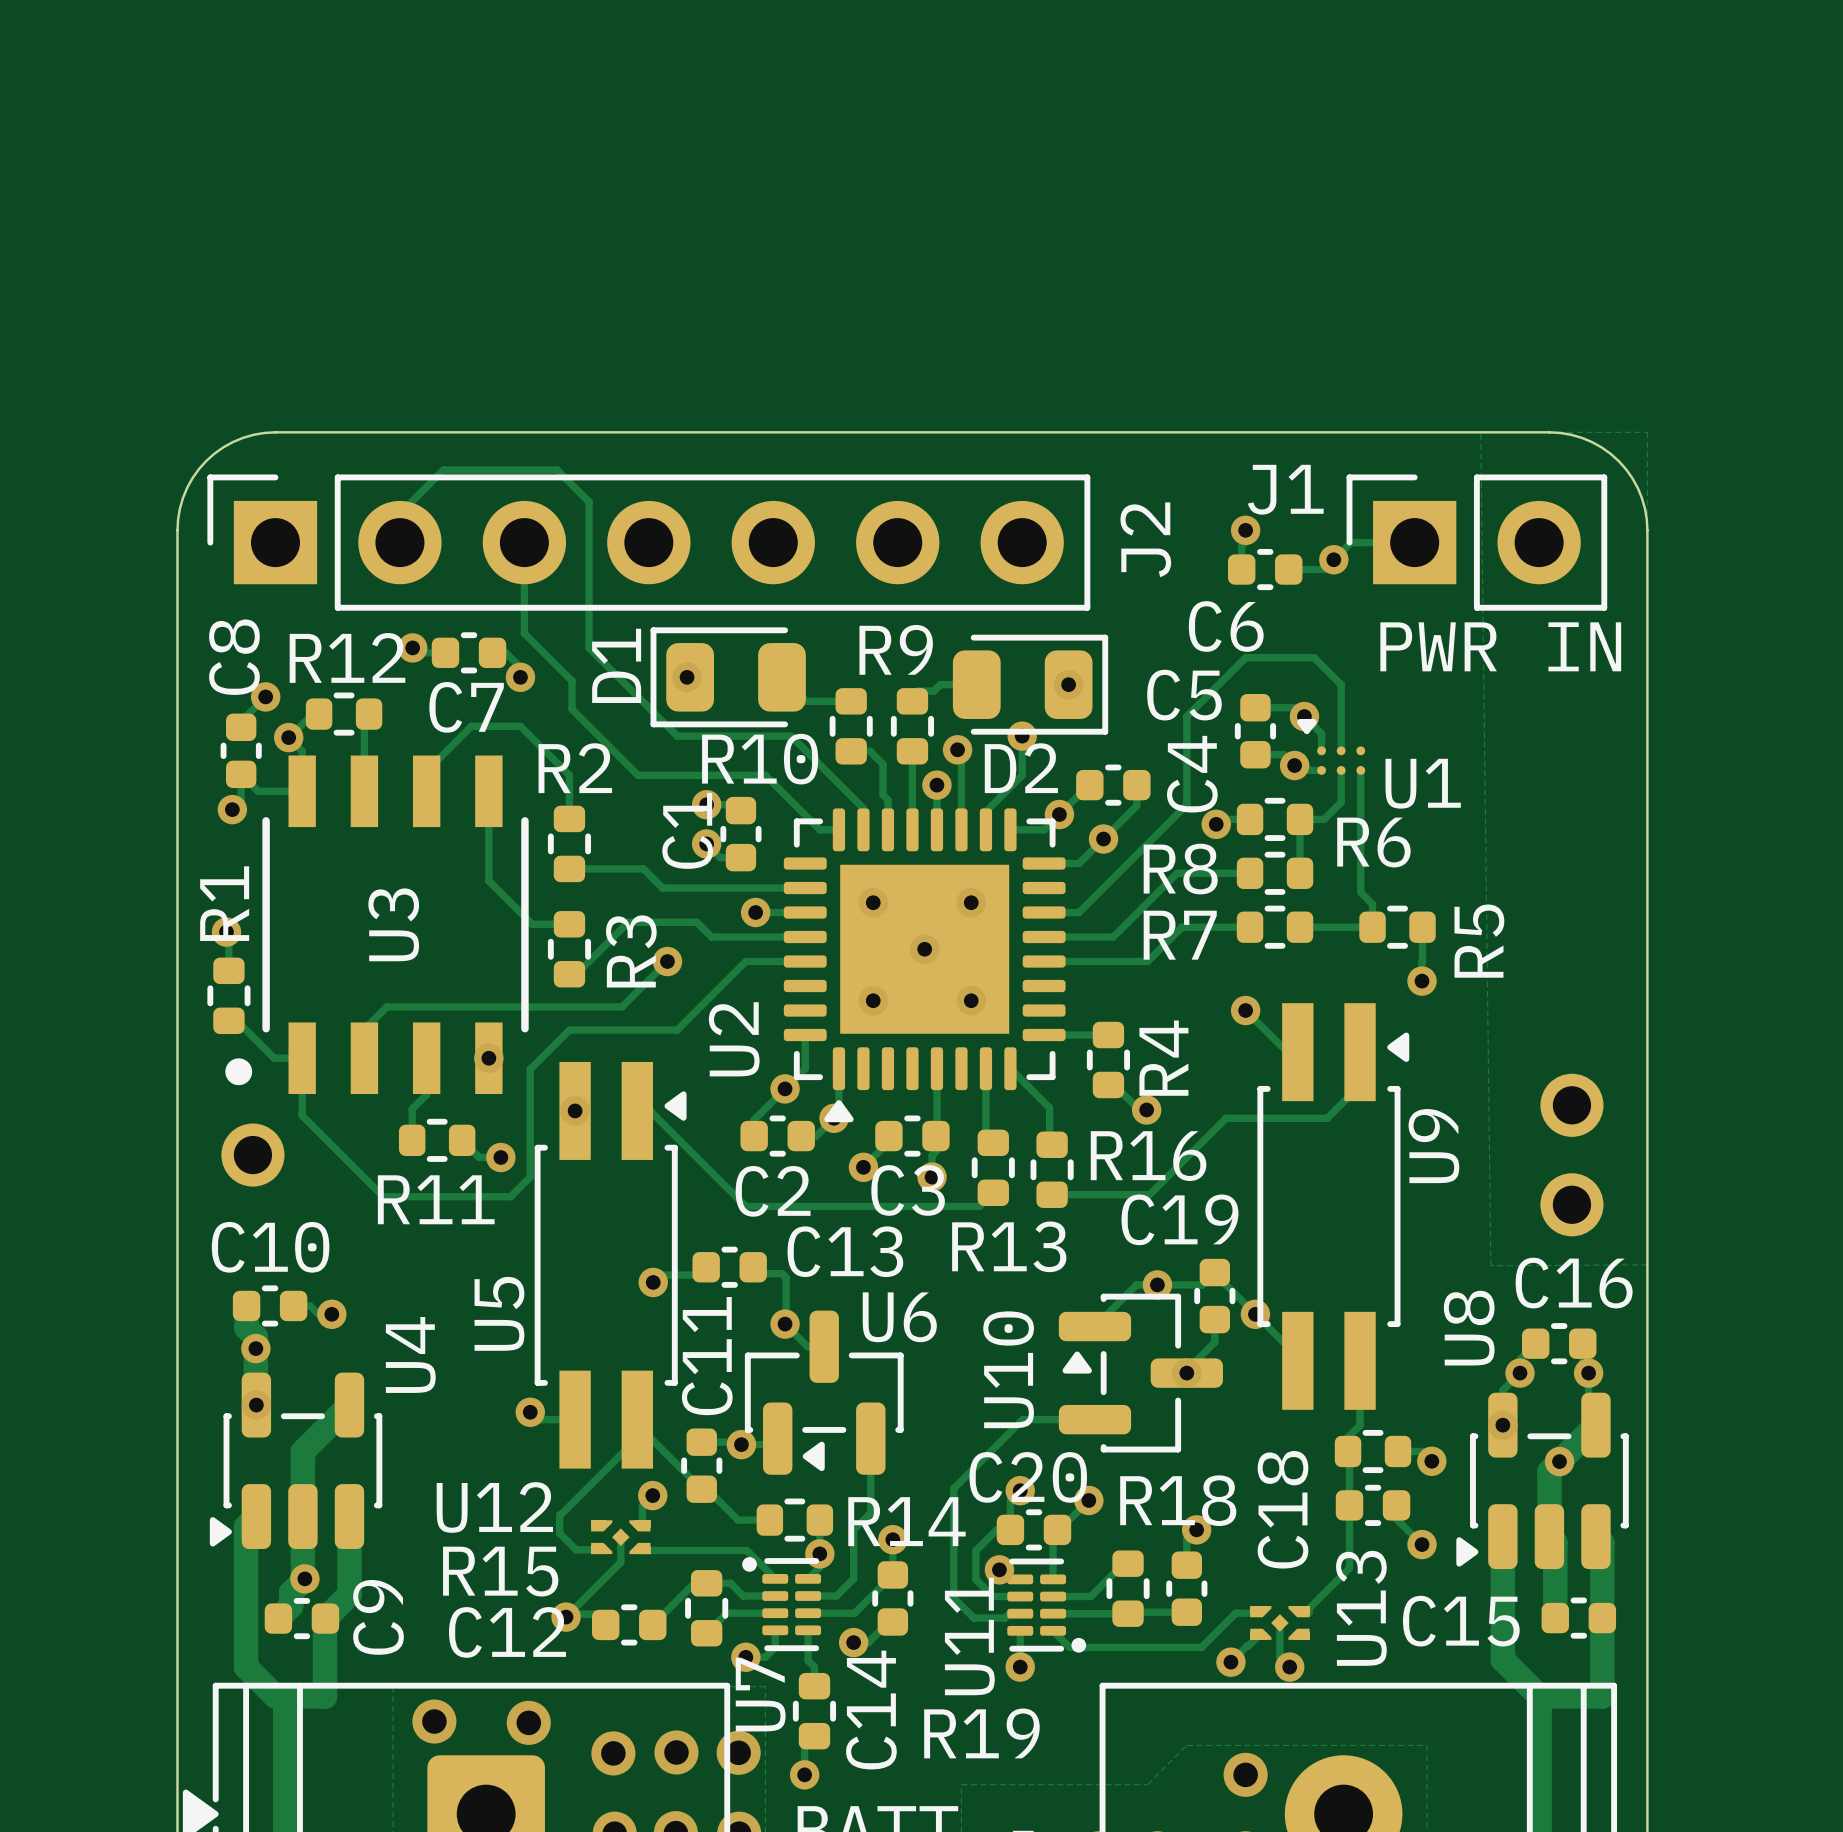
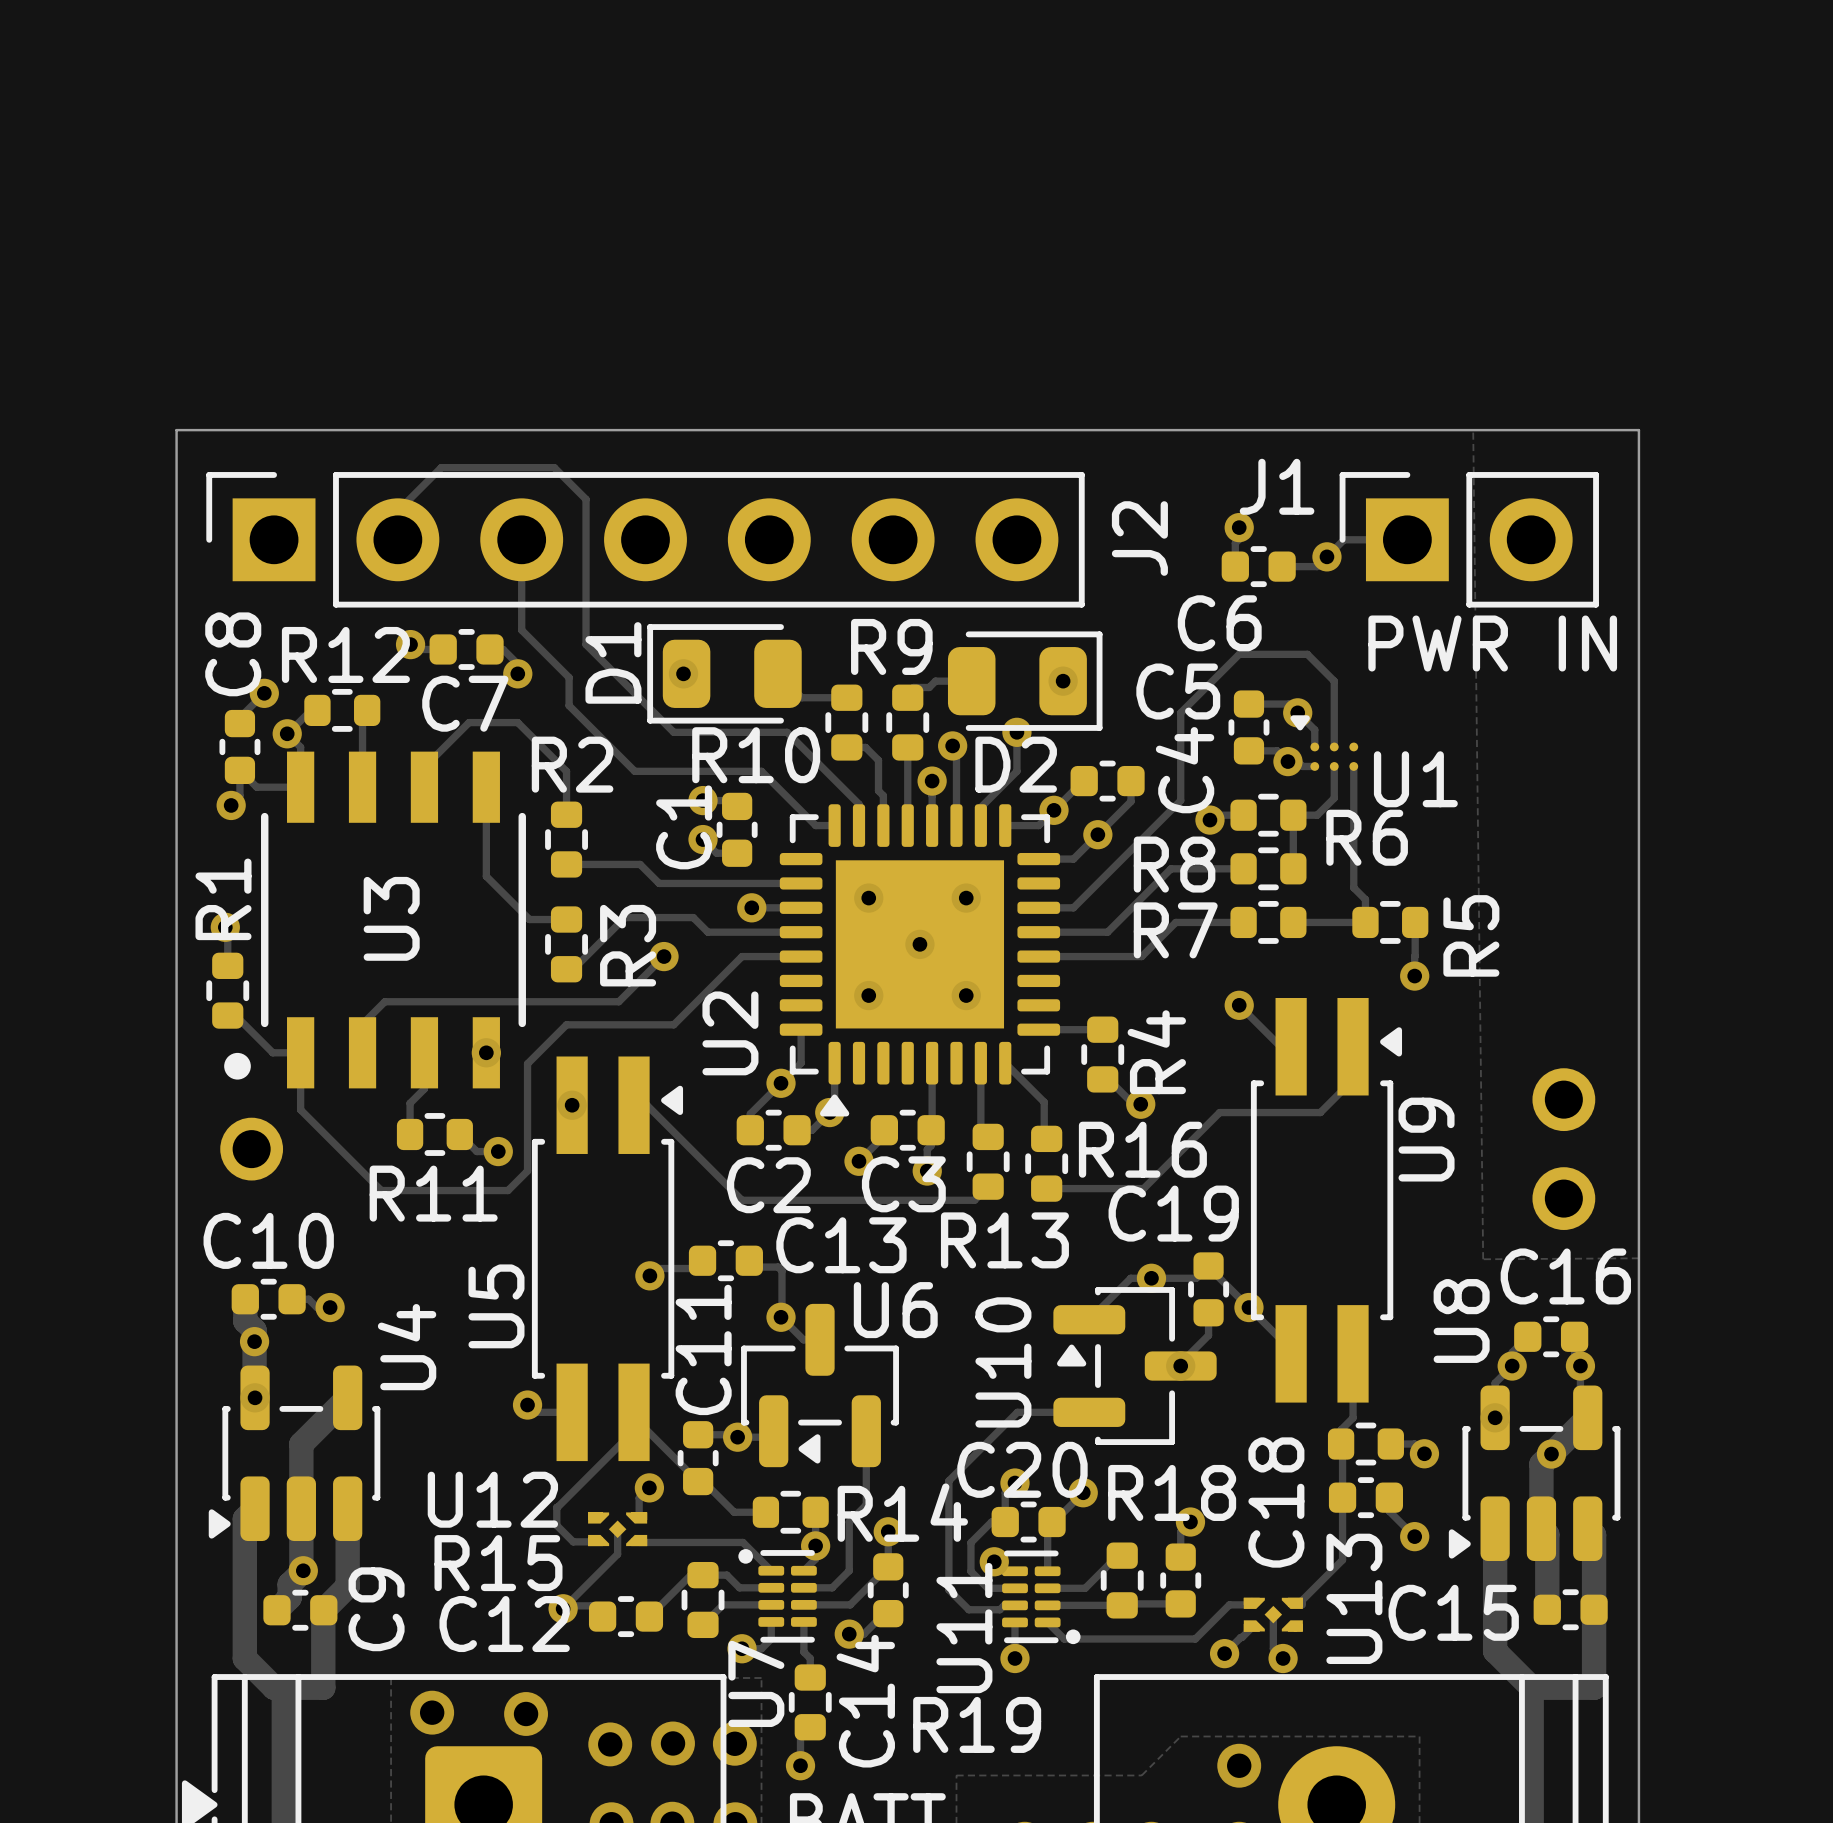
board edge: (275, 432) (243, 437) (223, 447) (206, 461) (187, 487) (179, 508) (177, 530) -> (274, 430) (176, 430) (176, 527)
board edge: (1549, 432) (1571, 434) (1591, 442) (1618, 461) (1637, 487) (1644, 508) (1647, 530) -> (1541, 430) (1638, 430) (1638, 527)

